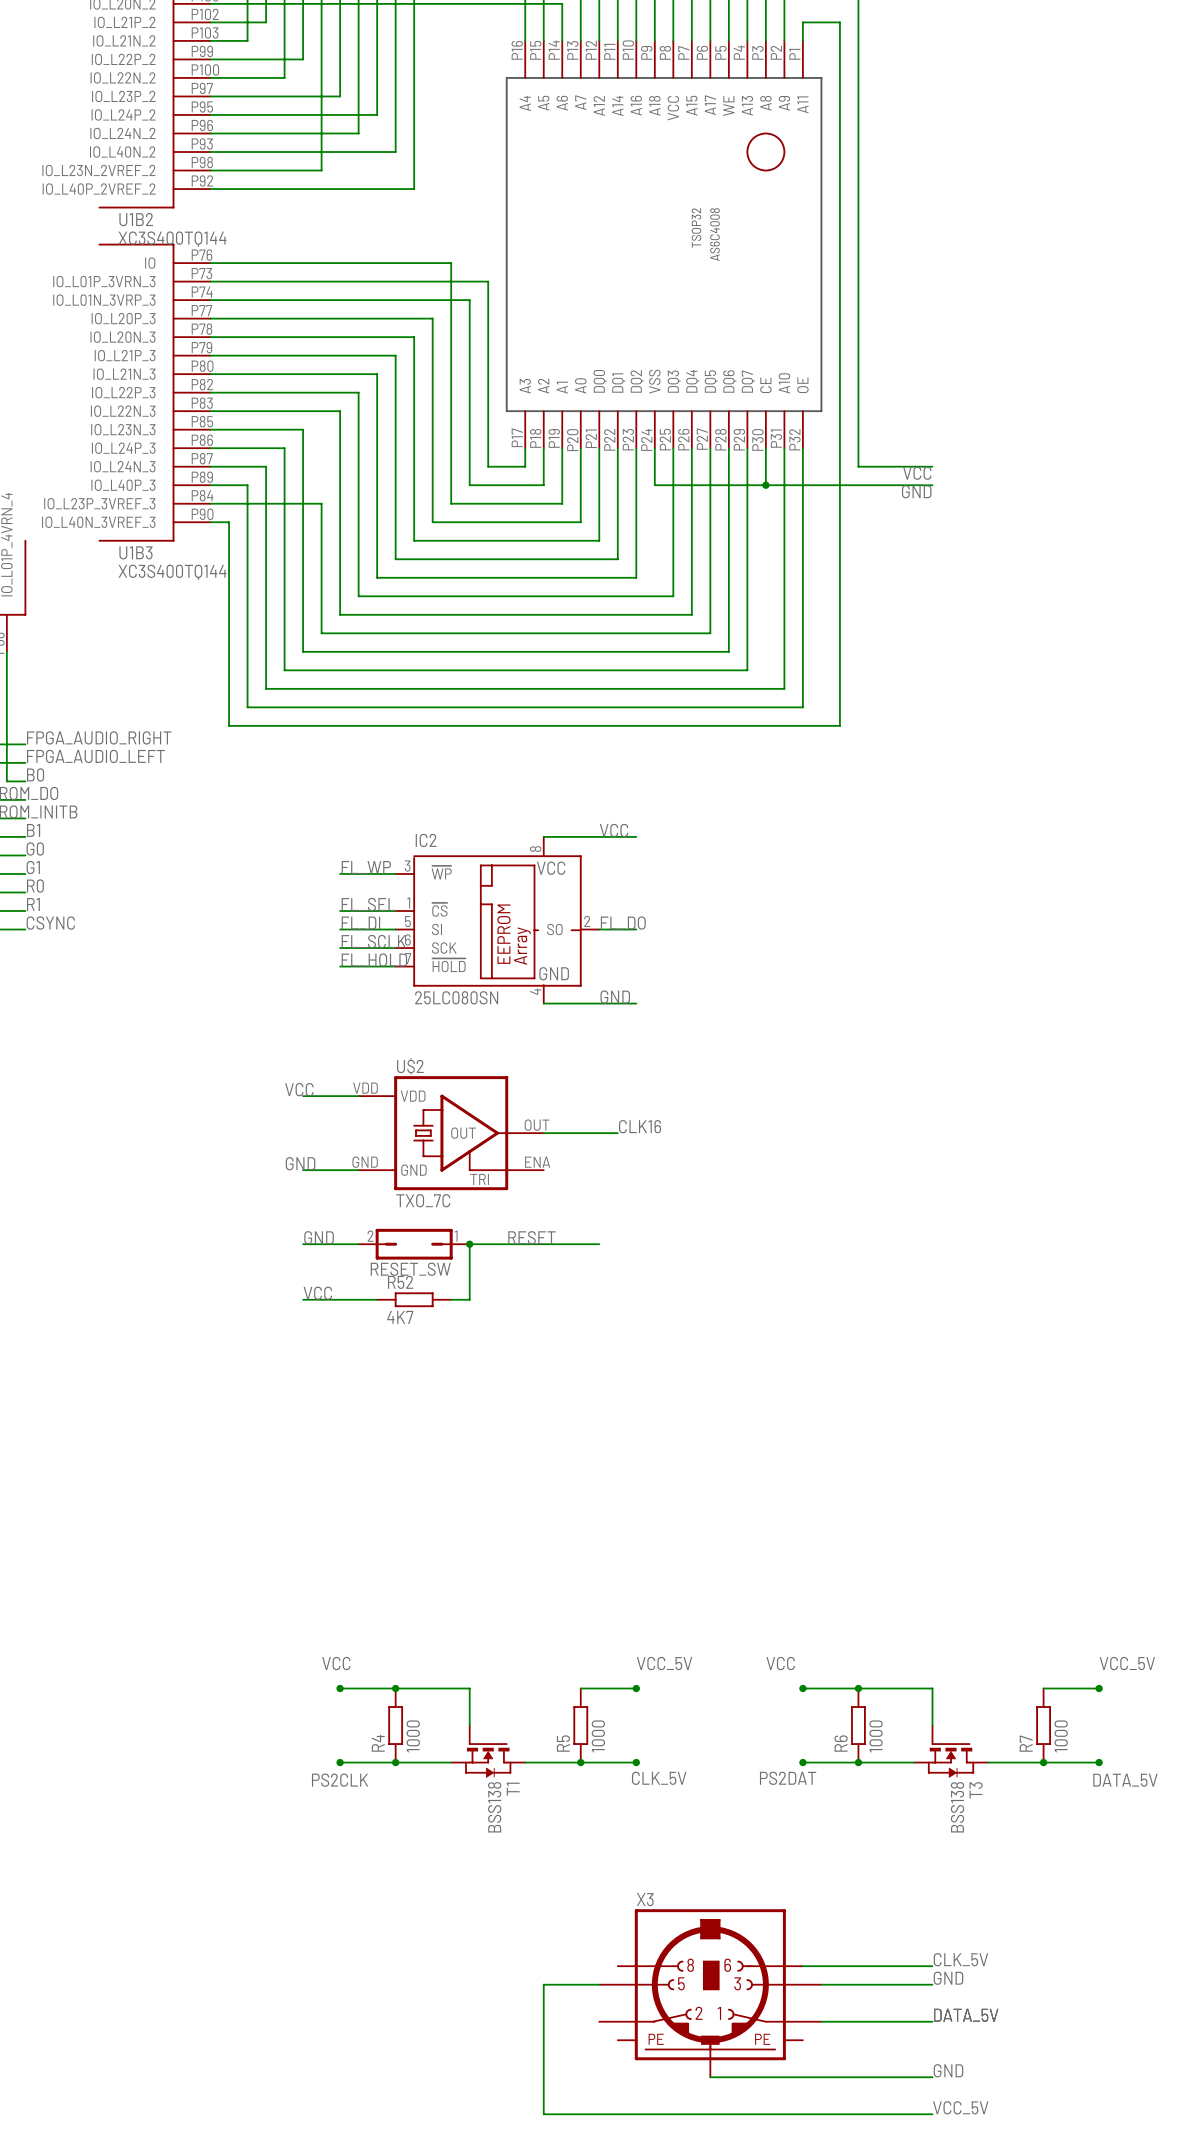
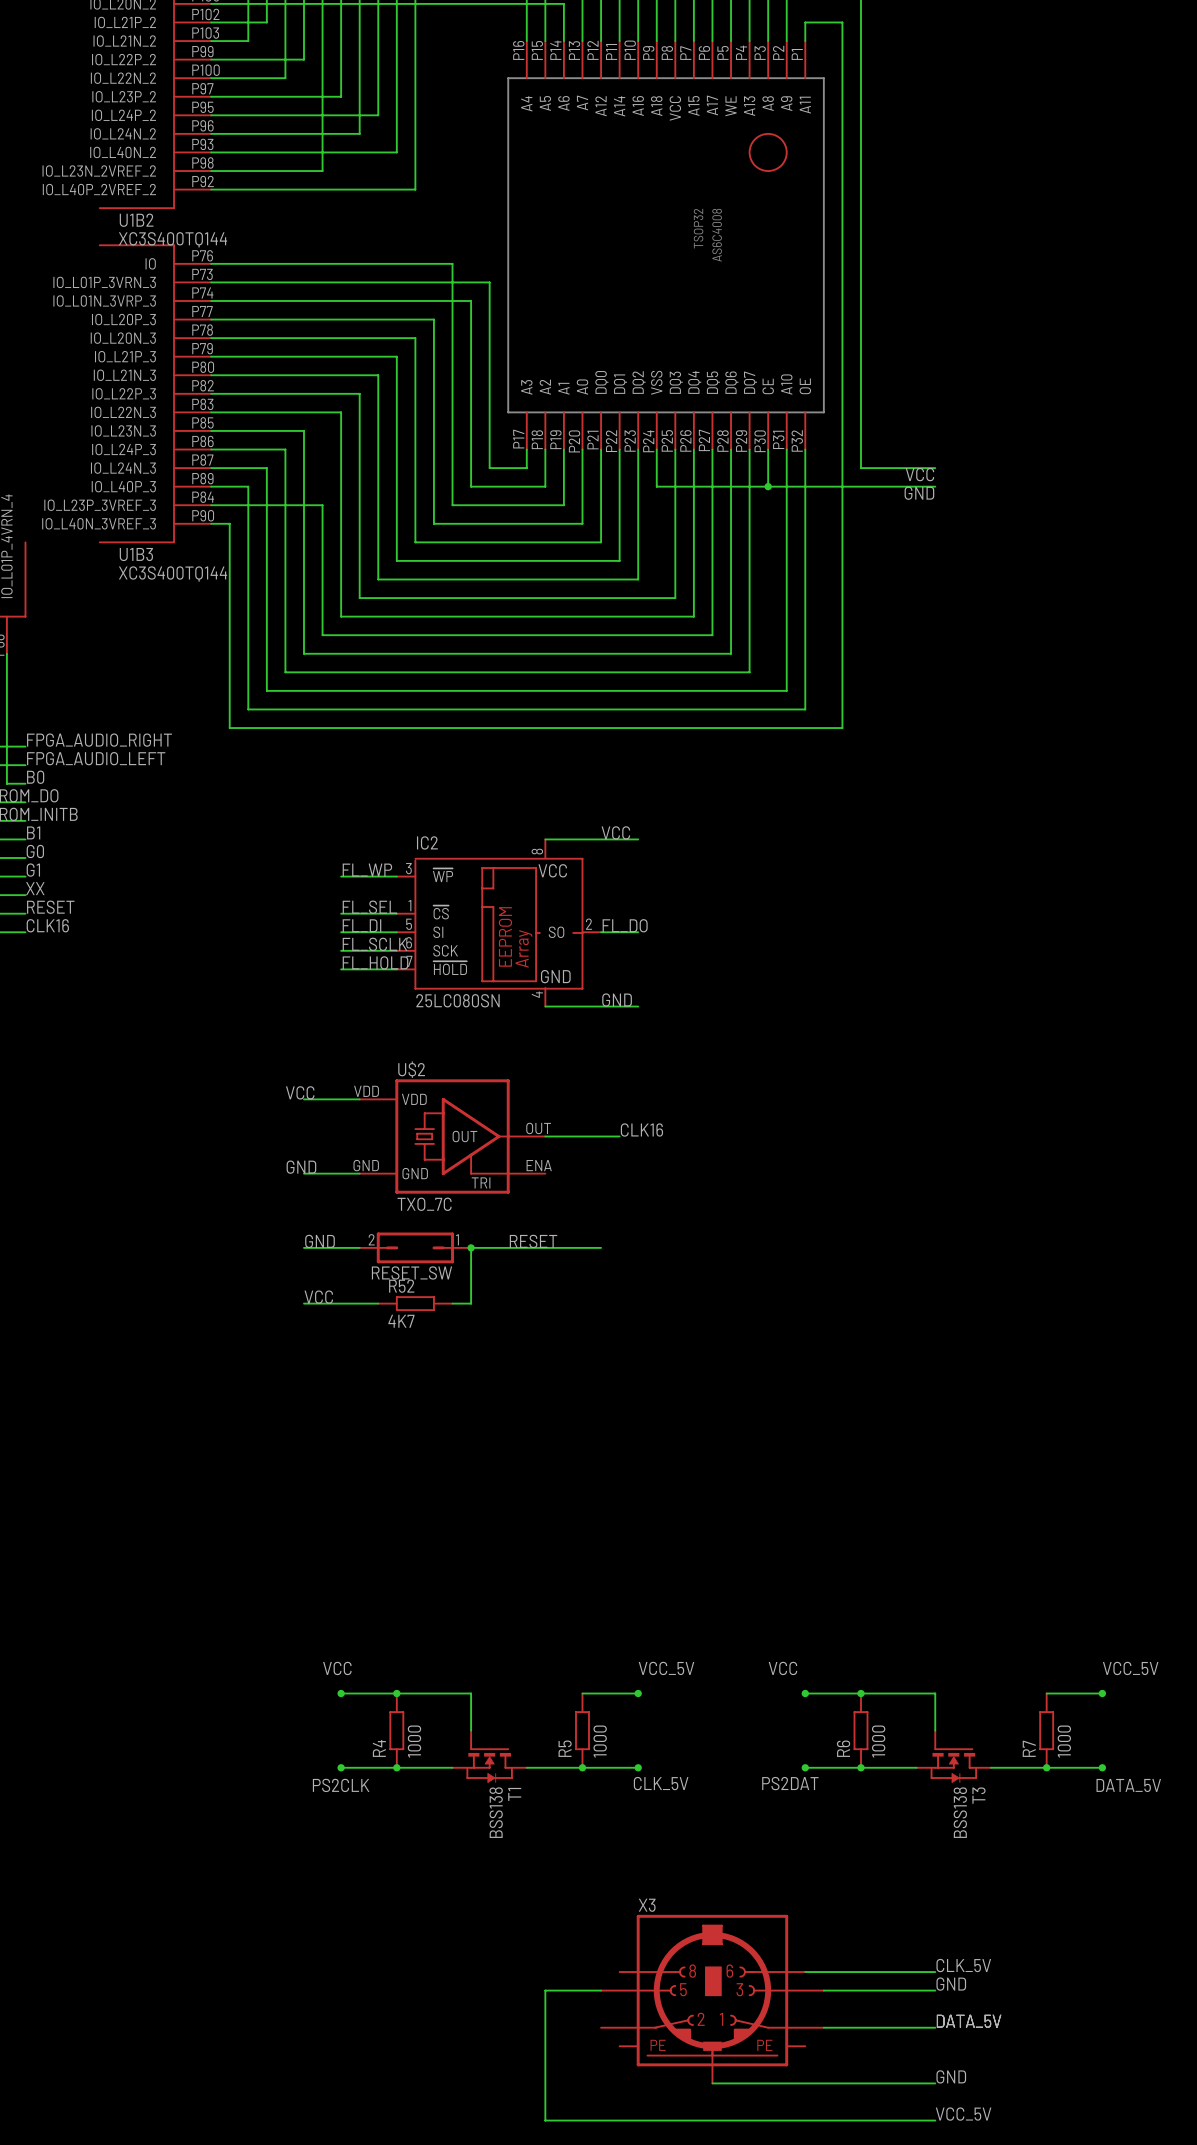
label: R0 (35, 886) -> XX (35, 888)
label: R1 (33, 904) -> RESET (50, 907)
label: CSYNC (50, 923) -> CLK16 (47, 925)

